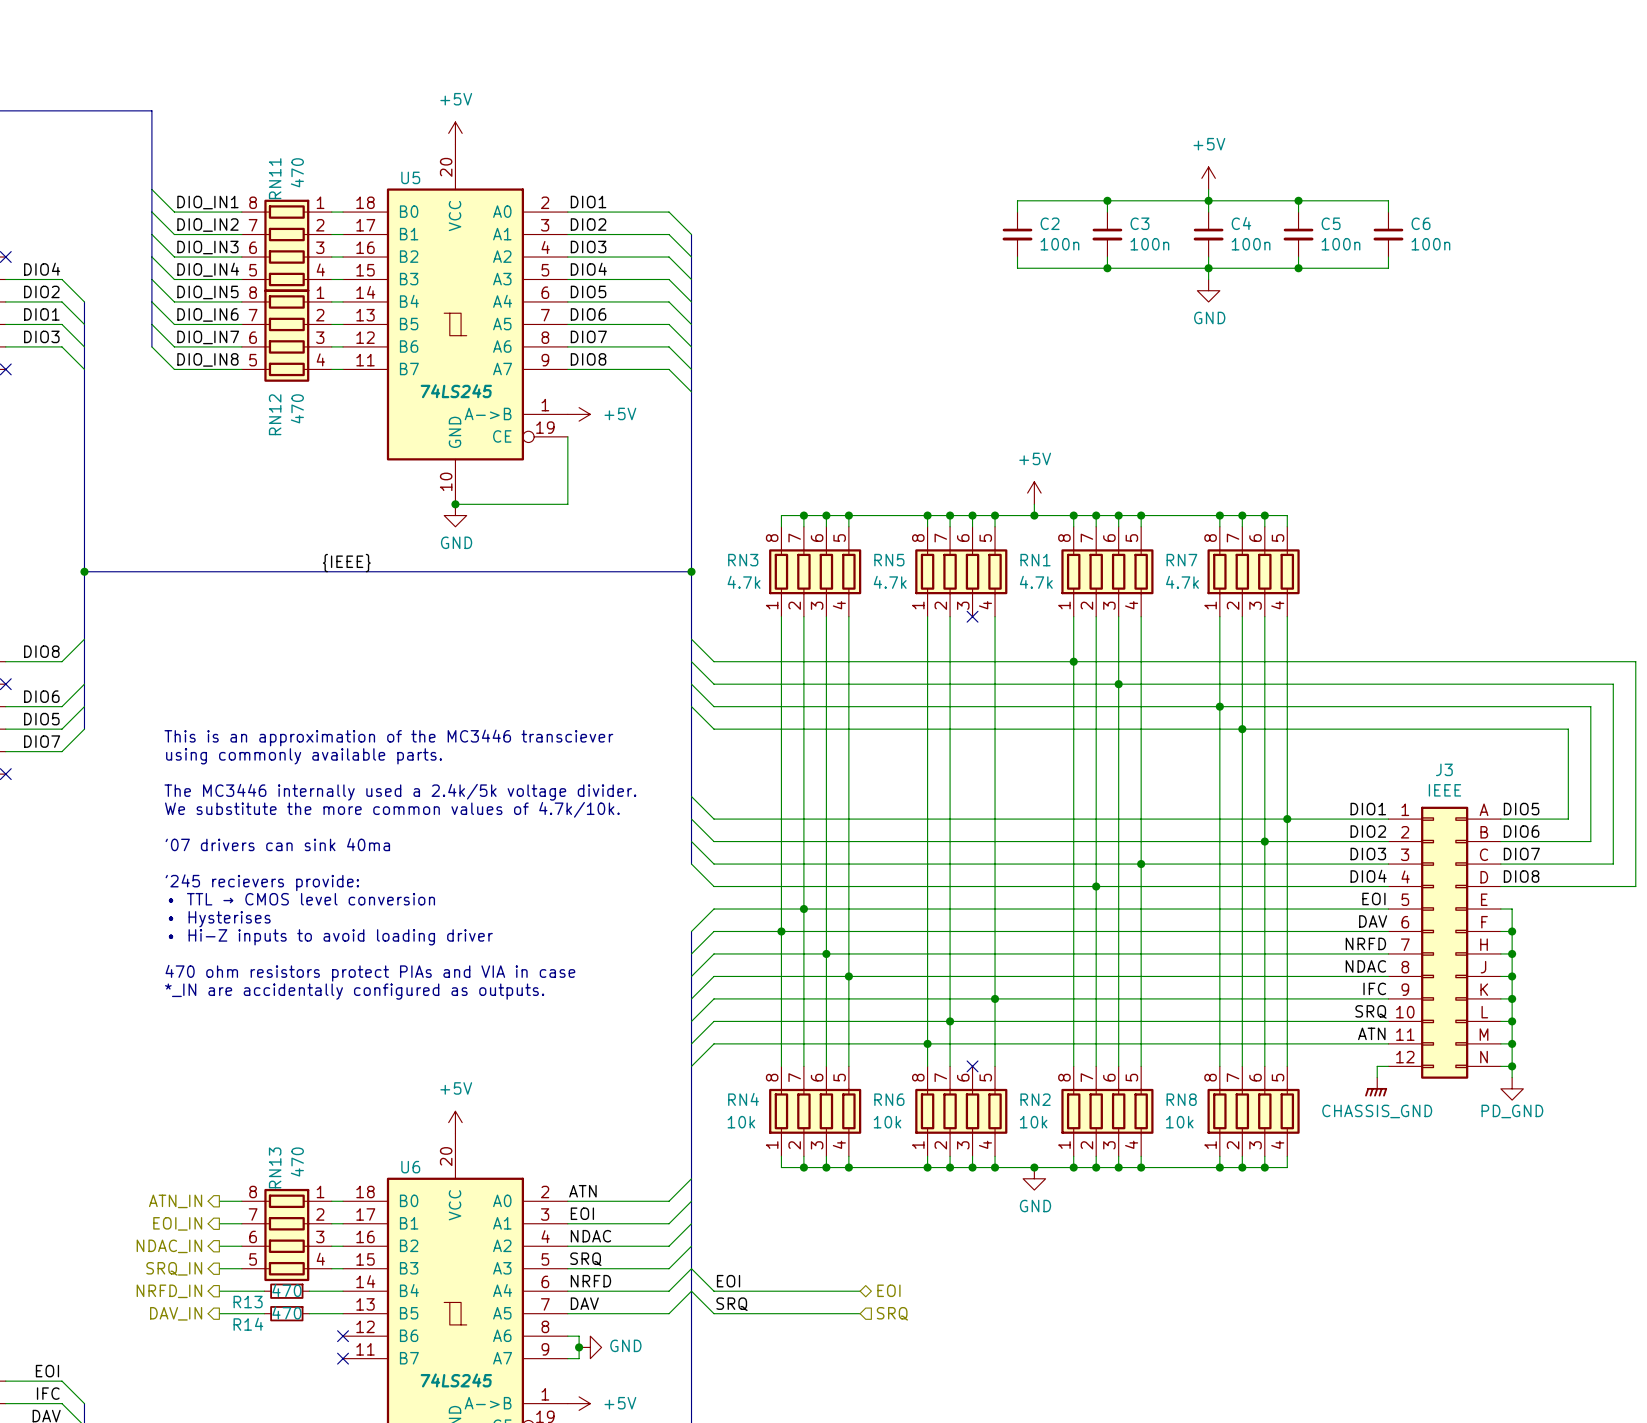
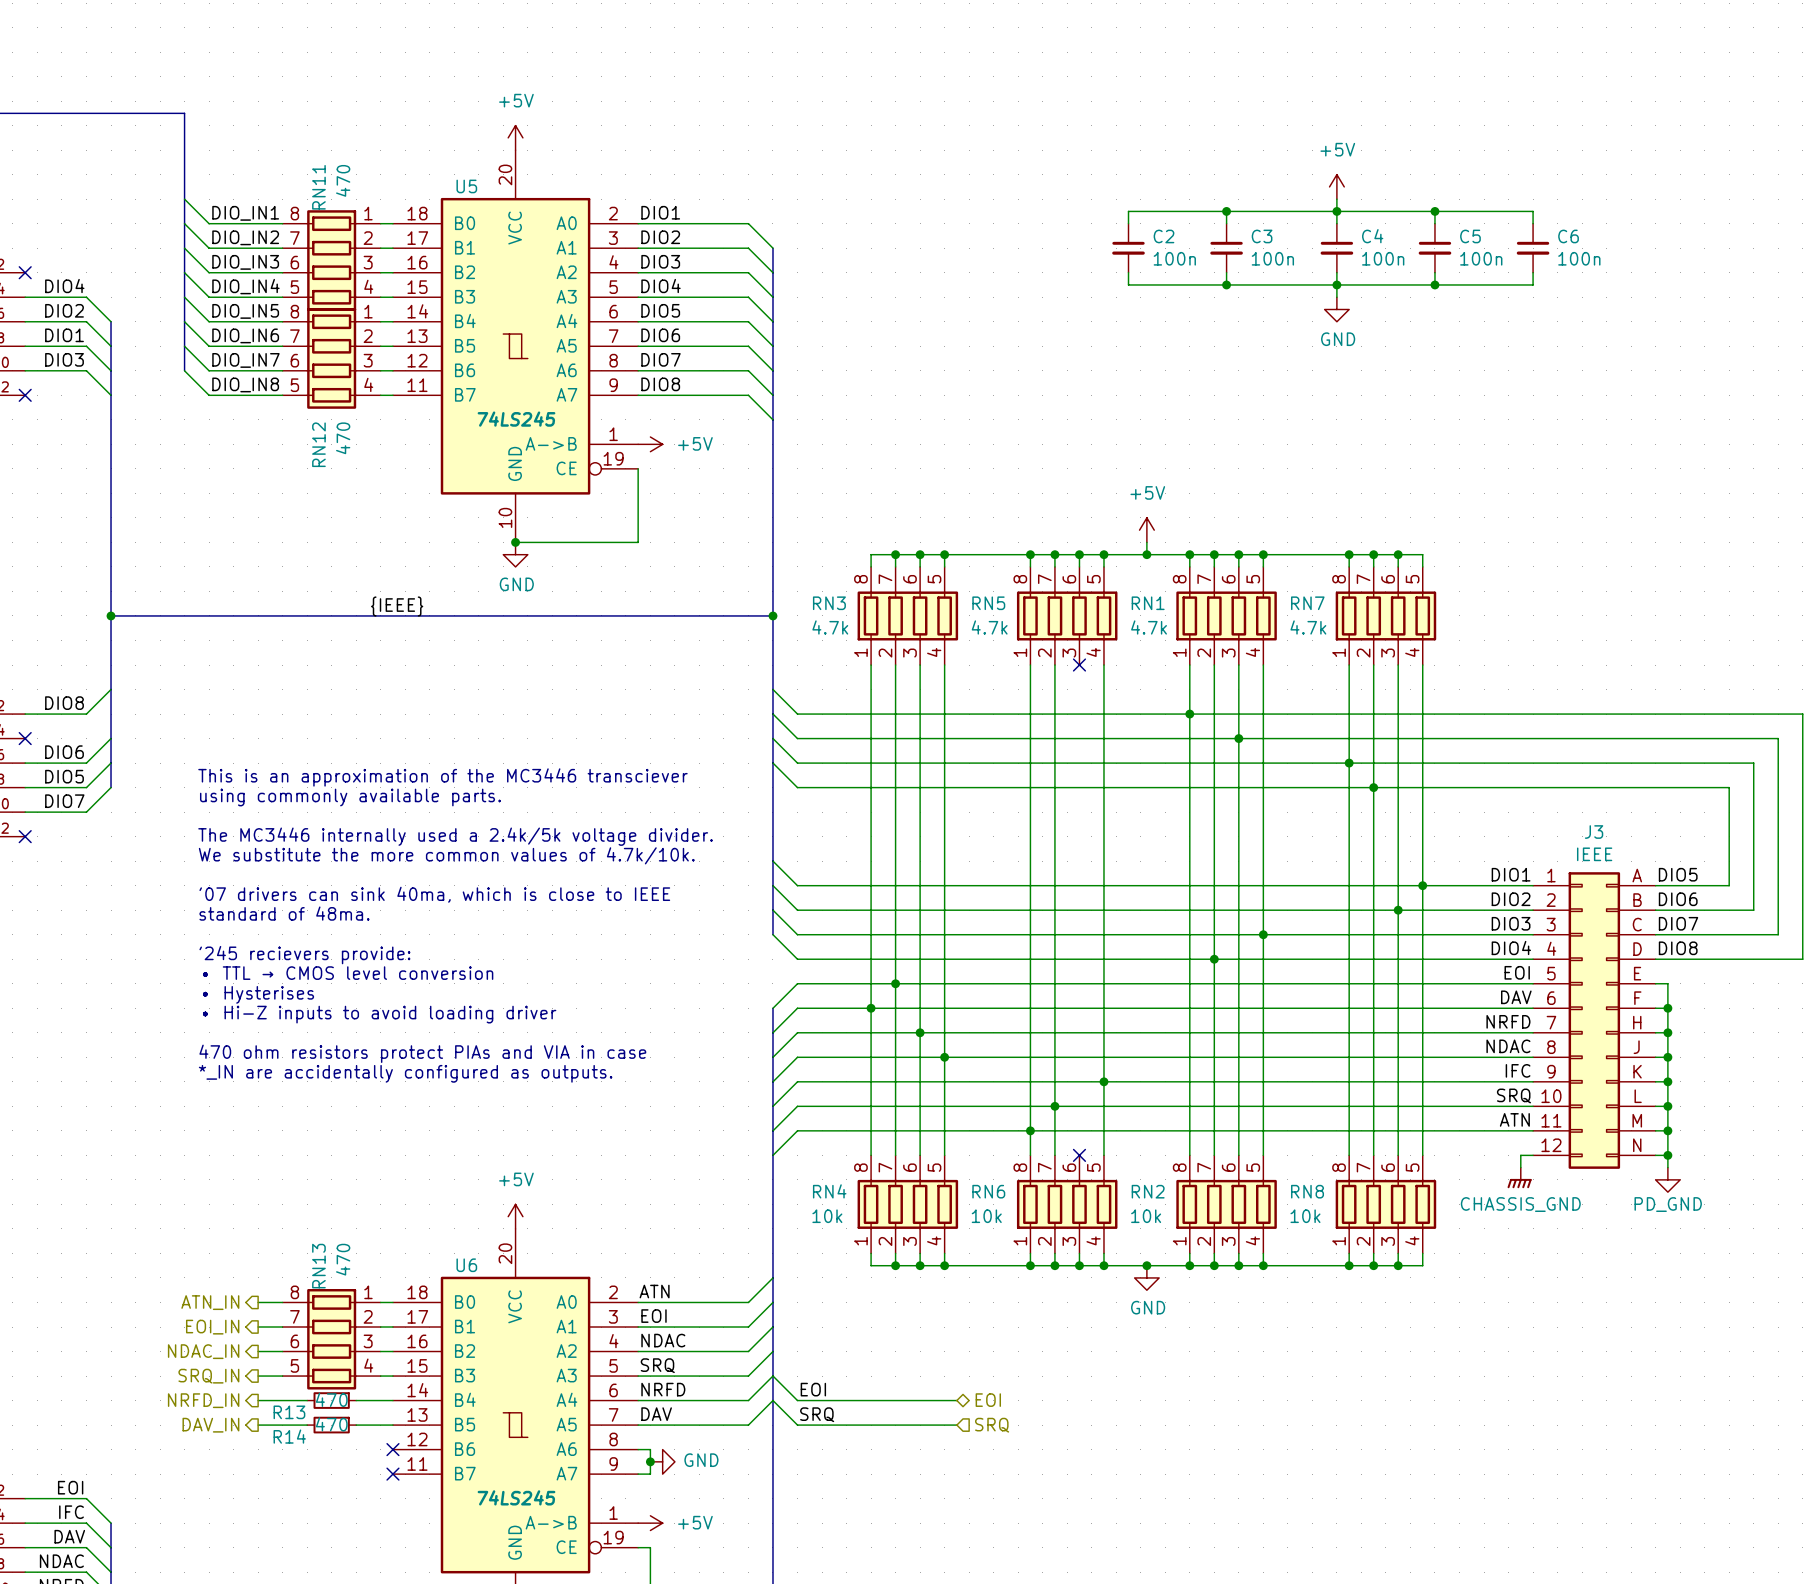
text: none -> This is an approximation of the MC3446 transciever (442, 777)
text: This is an approximation of the MC3446 transciever (388, 737) -> using commonly available parts. (350, 797)
text: using commonly available parts. (304, 756) -> none
text: none -> The MC3446 internally used a 2.4k/5k voltage divider. (455, 836)
text: The MC3446 internally used a 2.4k/5k voltage divider. (400, 792) -> We substitute the more common values of 4.7k/10k. (446, 855)
text: We substitute the more common values of 4.7k/10k. (392, 809) -> none
text: none -> '07 drivers can sink 40ma, which is close to IEEE (434, 894)
text: '07 drivers can sink 40ma (277, 844) -> standard of 48ma. (284, 913)

